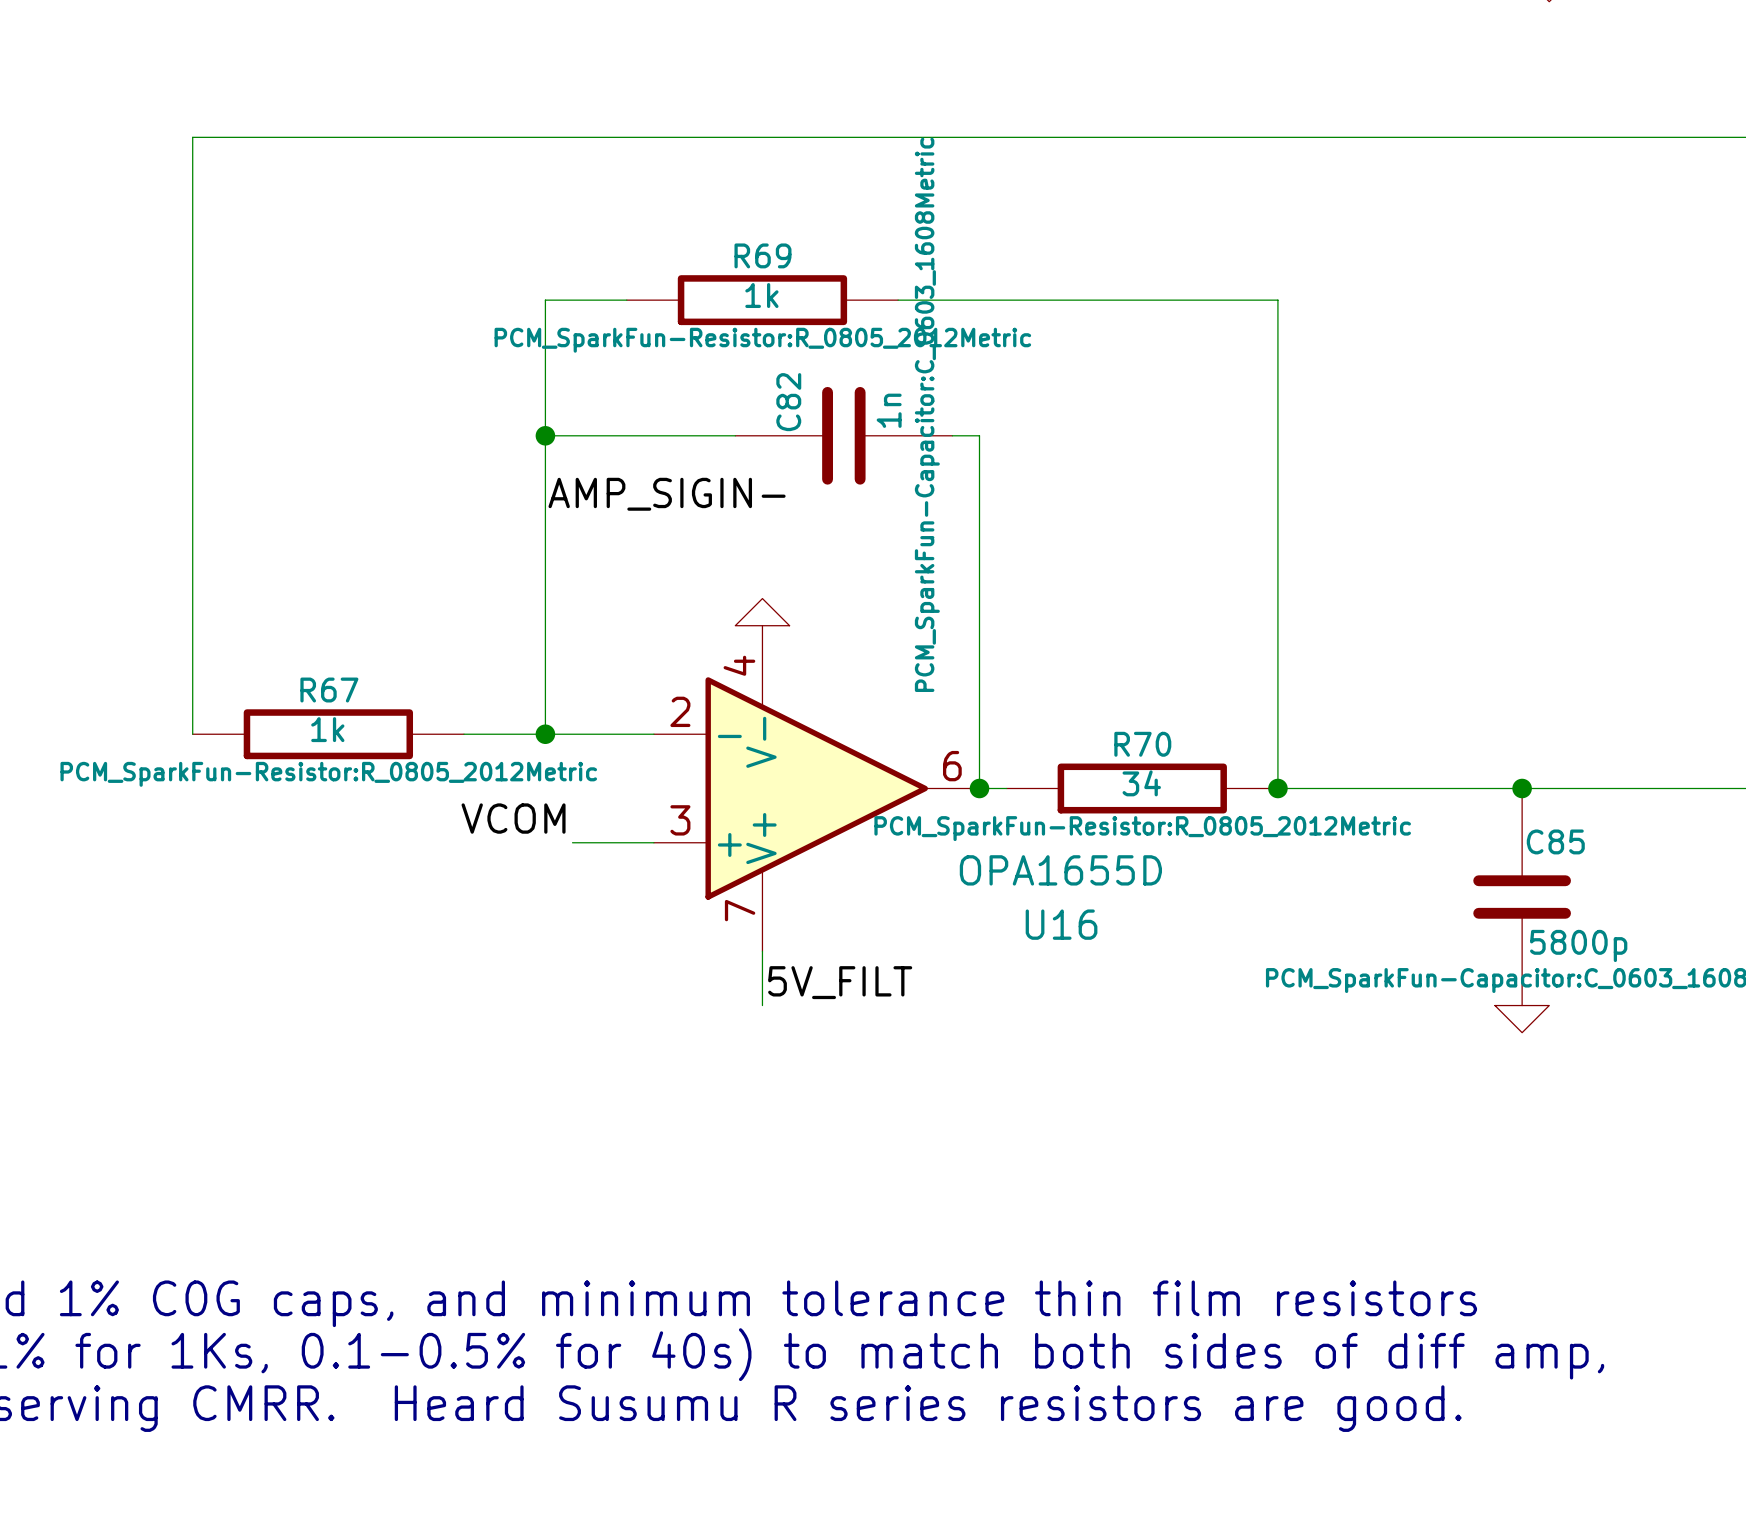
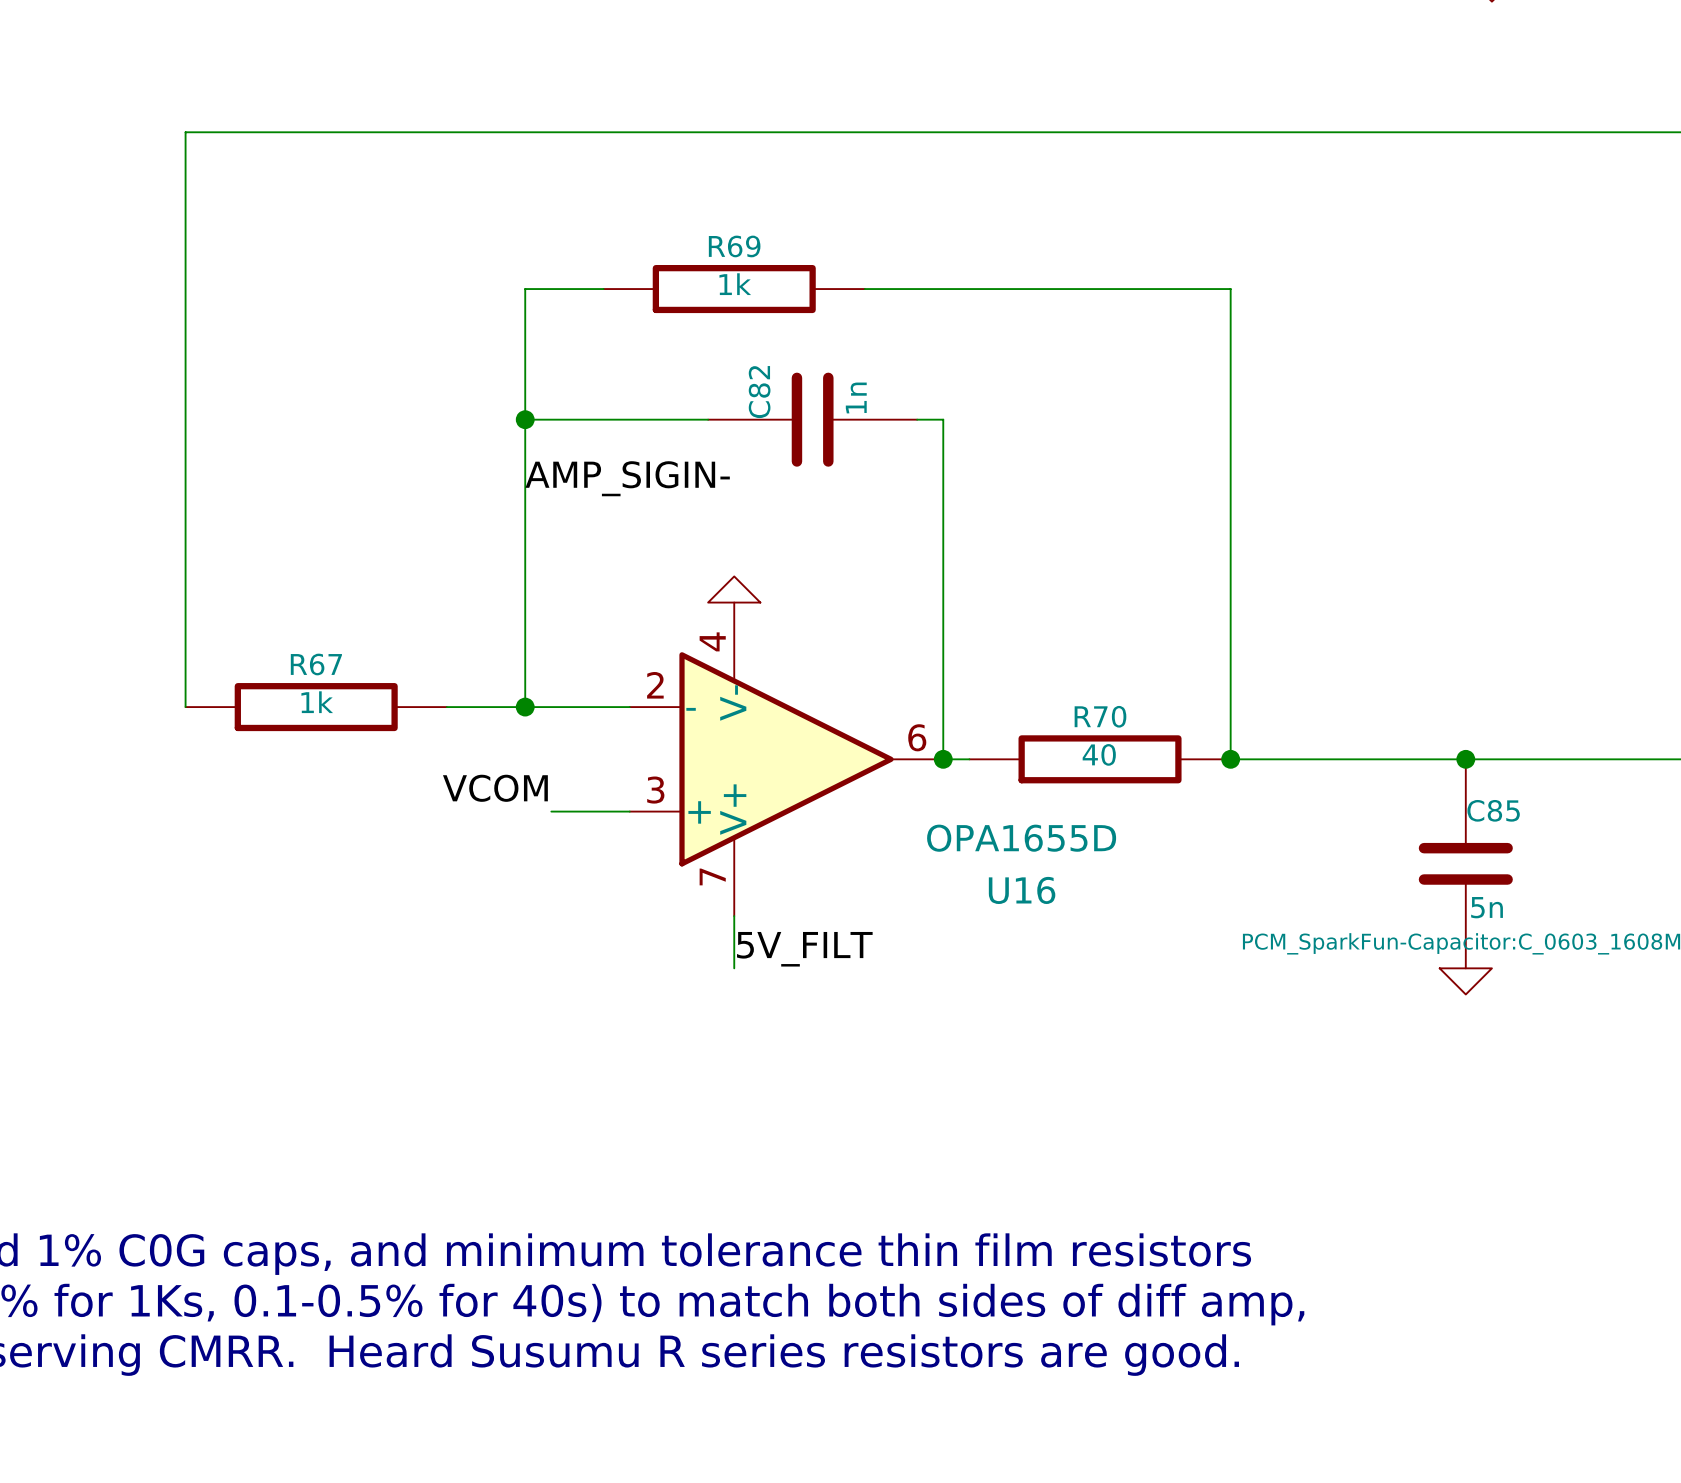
R69 text: PCM_SparkFun-Resistor:R_0805_2012Metric (762, 340) -> none
C82 text: PCM_SparkFun-Capacitor:C_0603_1608Metric (927, 414) -> none
R67 text: PCM_SparkFun-Resistor:R_0805_2012Metric (328, 774) -> none
R70 value: 34 (1141, 783) -> 40 (1099, 754)
R70 text: PCM_SparkFun-Resistor:R_0805_2012Metric (1142, 828) -> none
C85 value: 5800p (1578, 945) -> 5n (1487, 907)

